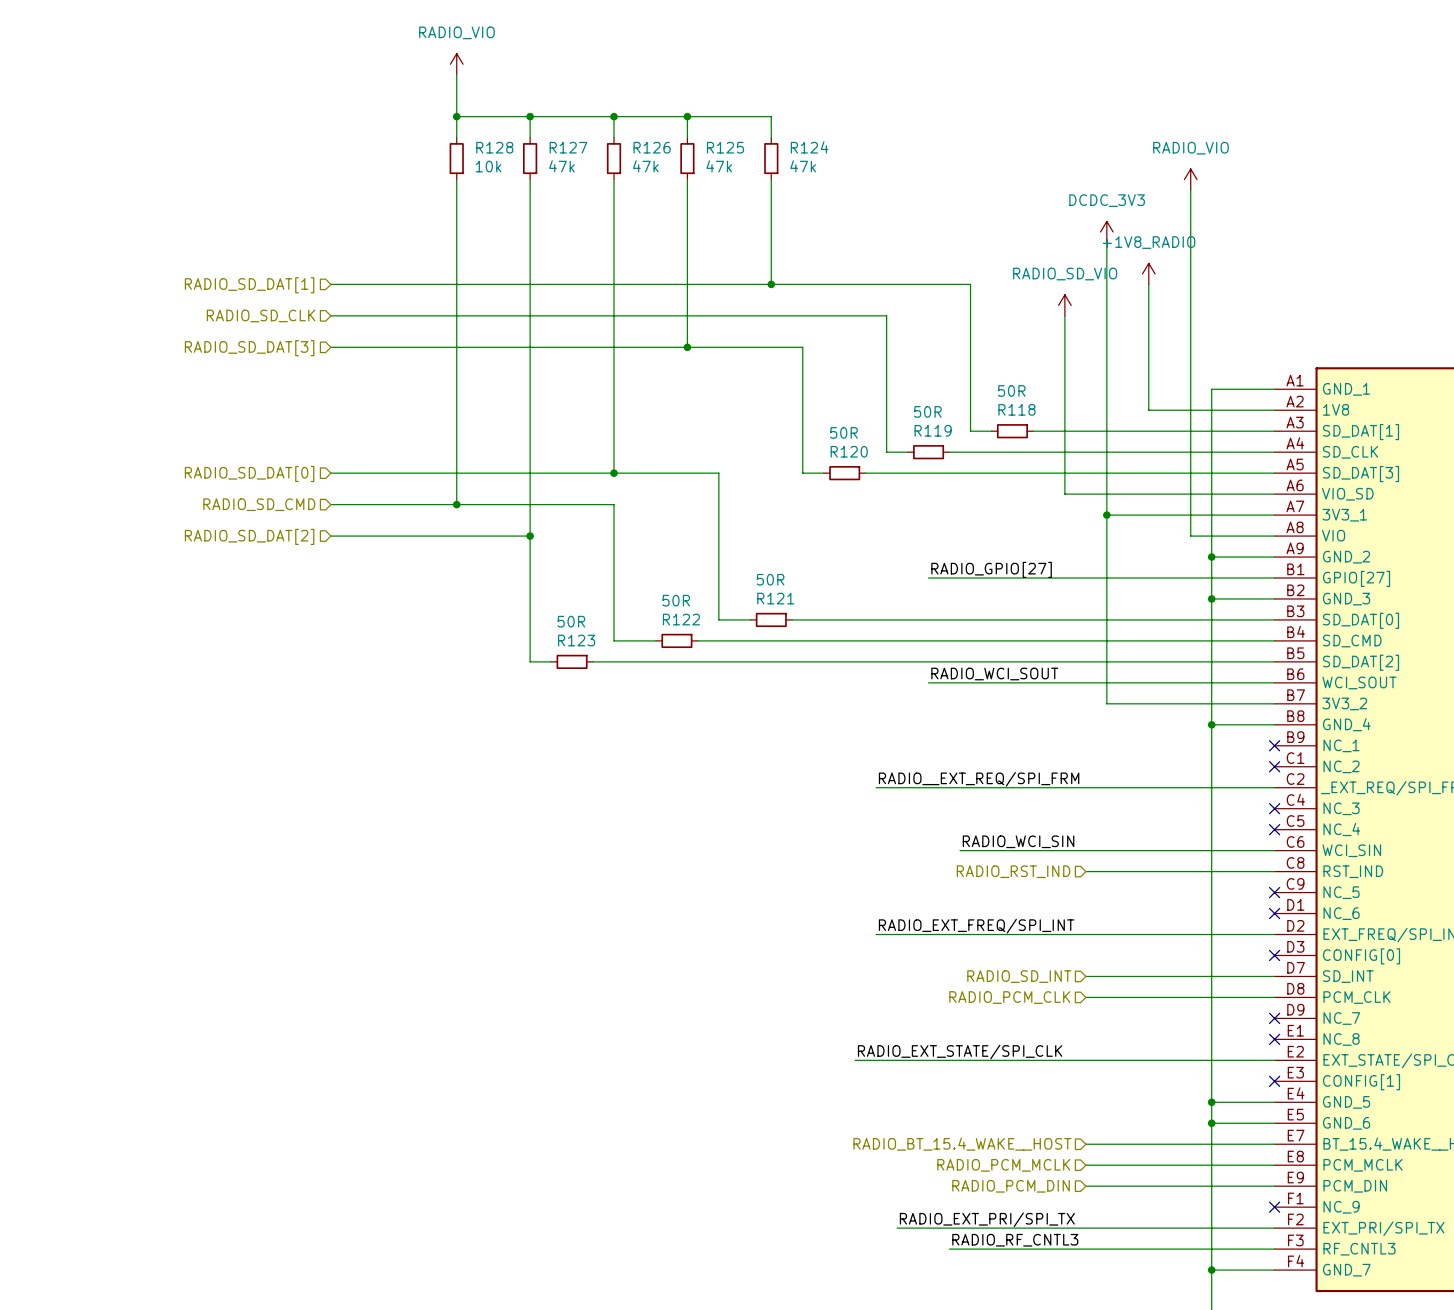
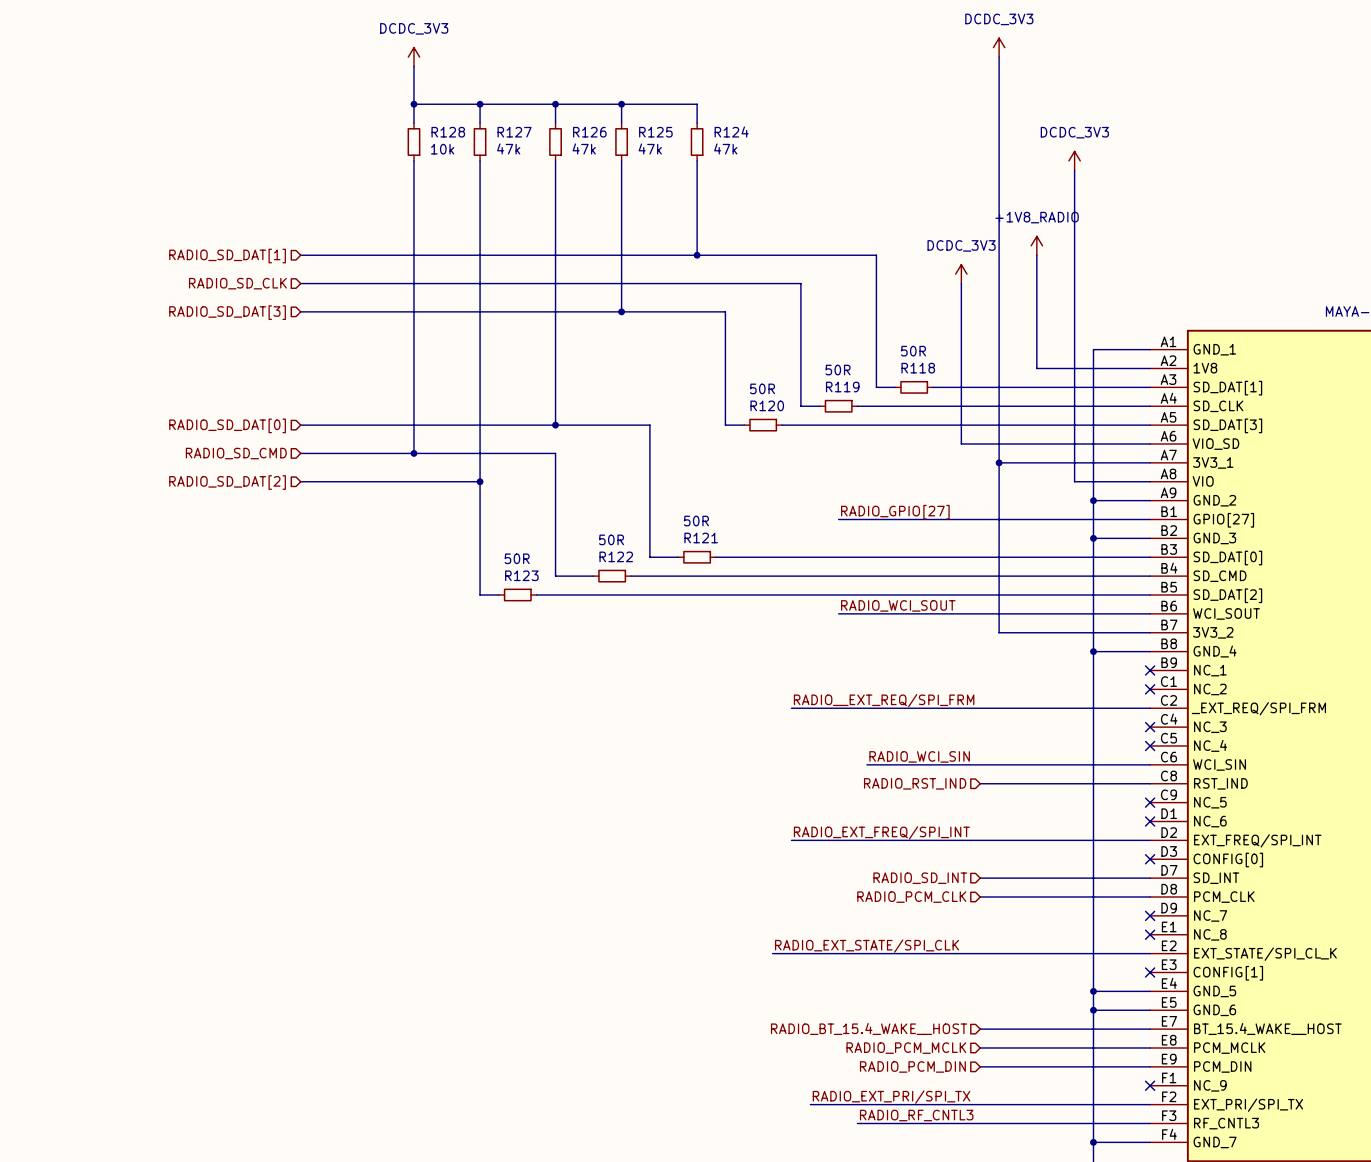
power symbol: RADIO_VIO (456, 64) -> DCDC_3V3 (413, 57)
wire: none -> (999, 57) (999, 217)
power symbol: RADIO_VIO (1190, 179) -> DCDC_3V3 (1074, 160)
power symbol position: DCDC_3V3 (1106, 231) -> DCDC_3V3 (999, 47)
power symbol: RADIO_SD_VIO (1064, 305) -> DCDC_3V3 (961, 274)

